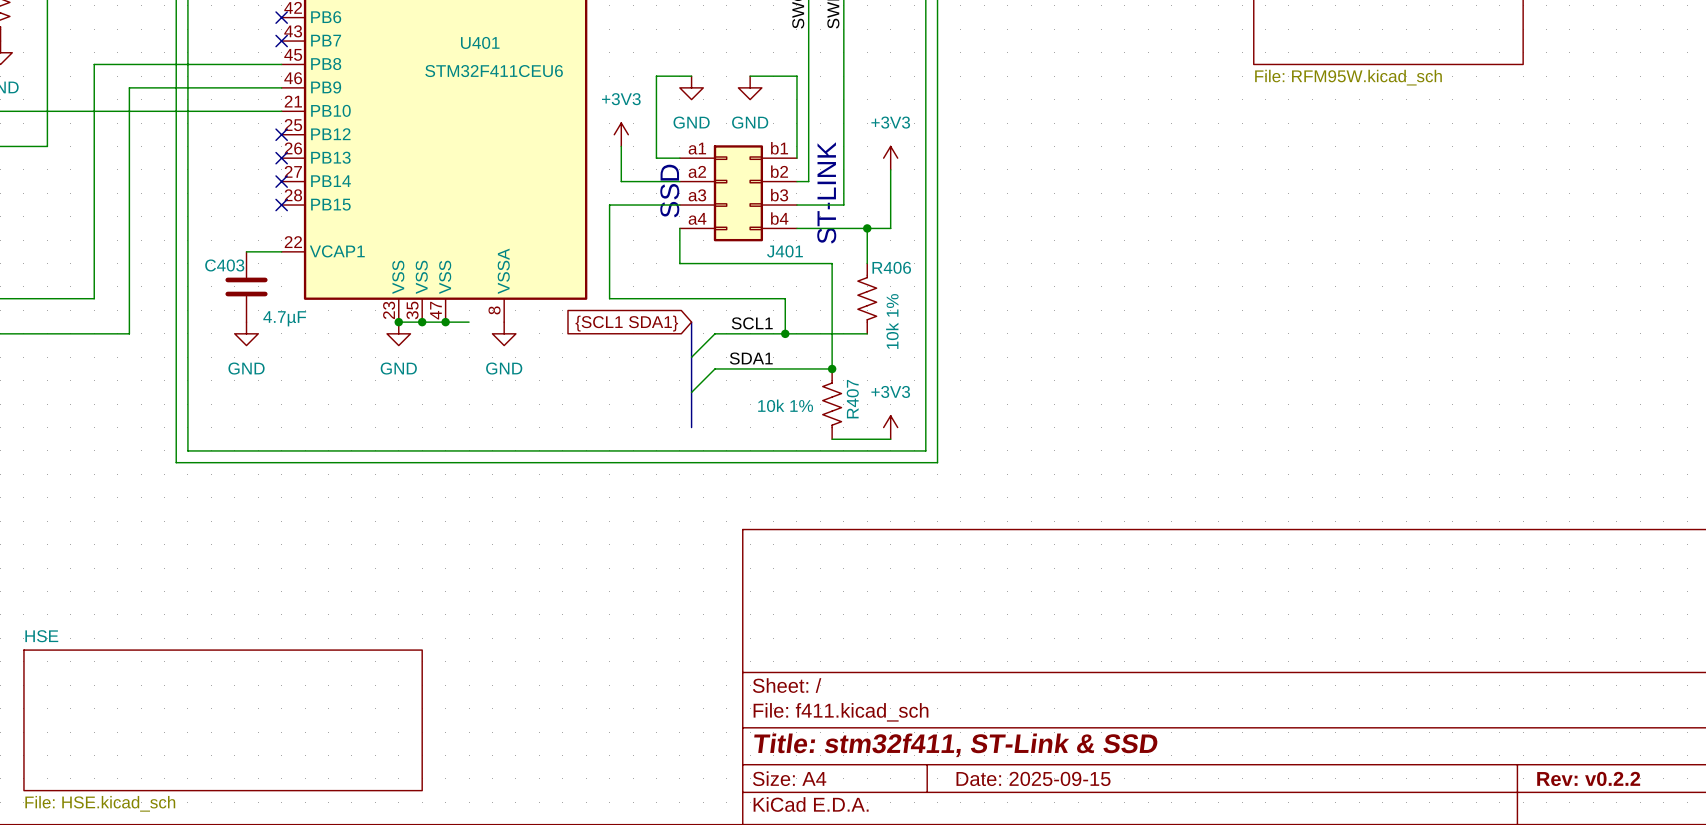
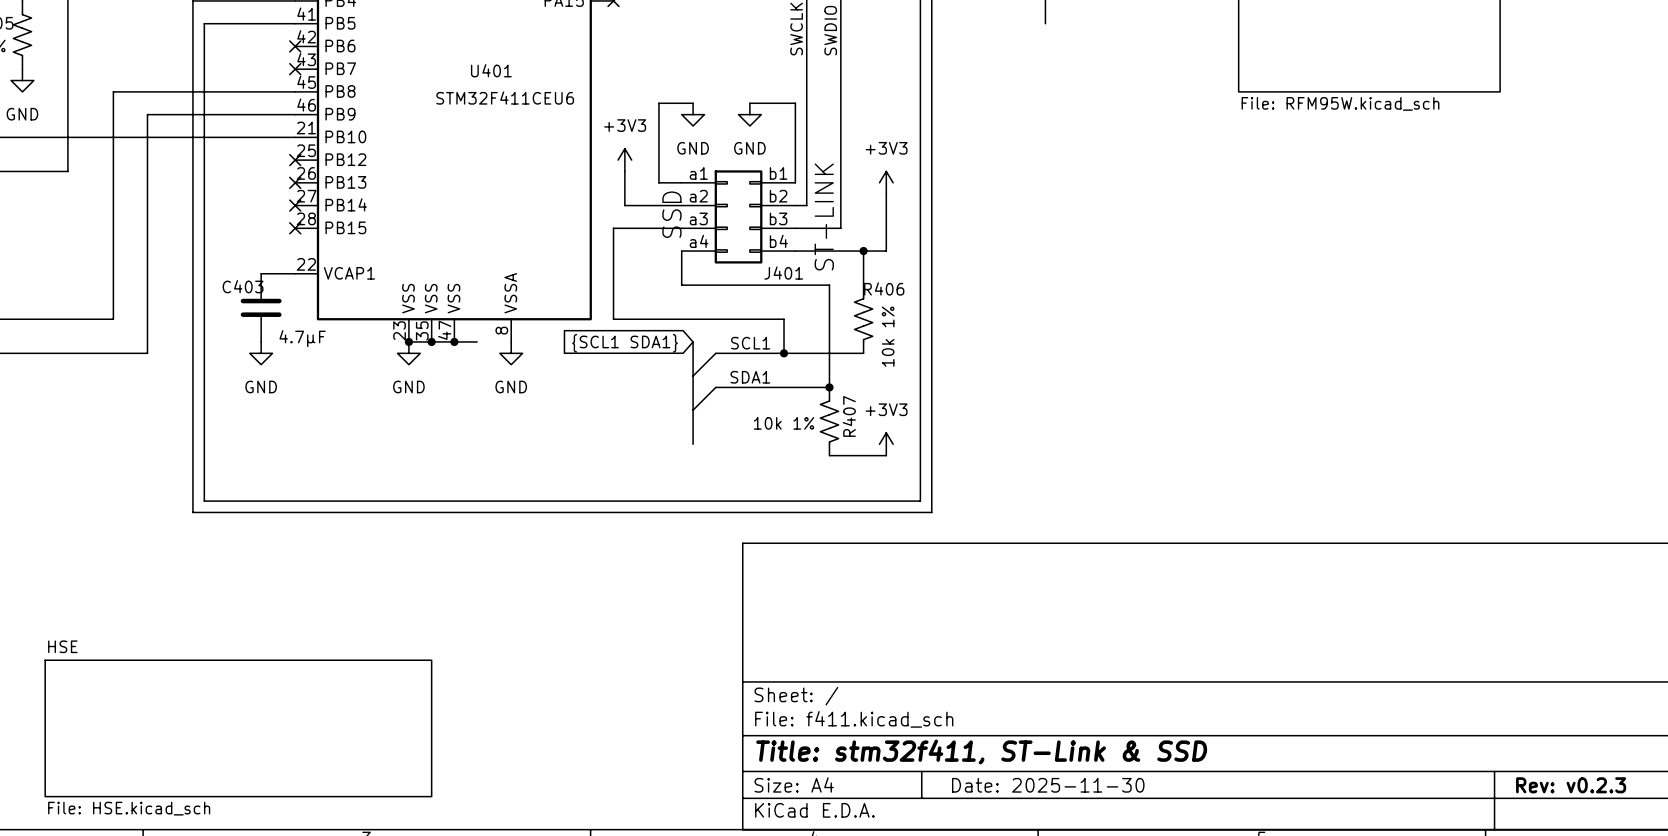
wire: (187, 450) (925, 450) -> (204, 466) (204, 501) (920, 501) (920, 466)
wire: (176, 462) (937, 462) -> (192, 478) (192, 512) (931, 512) (931, 478)
title block: Date: 2025-09-15 (1033, 778) -> Date: 2025-11-30 (1048, 785)
title block: Rev: v0.2.2 (1588, 778) -> Rev: v0.2.3 (1571, 785)

